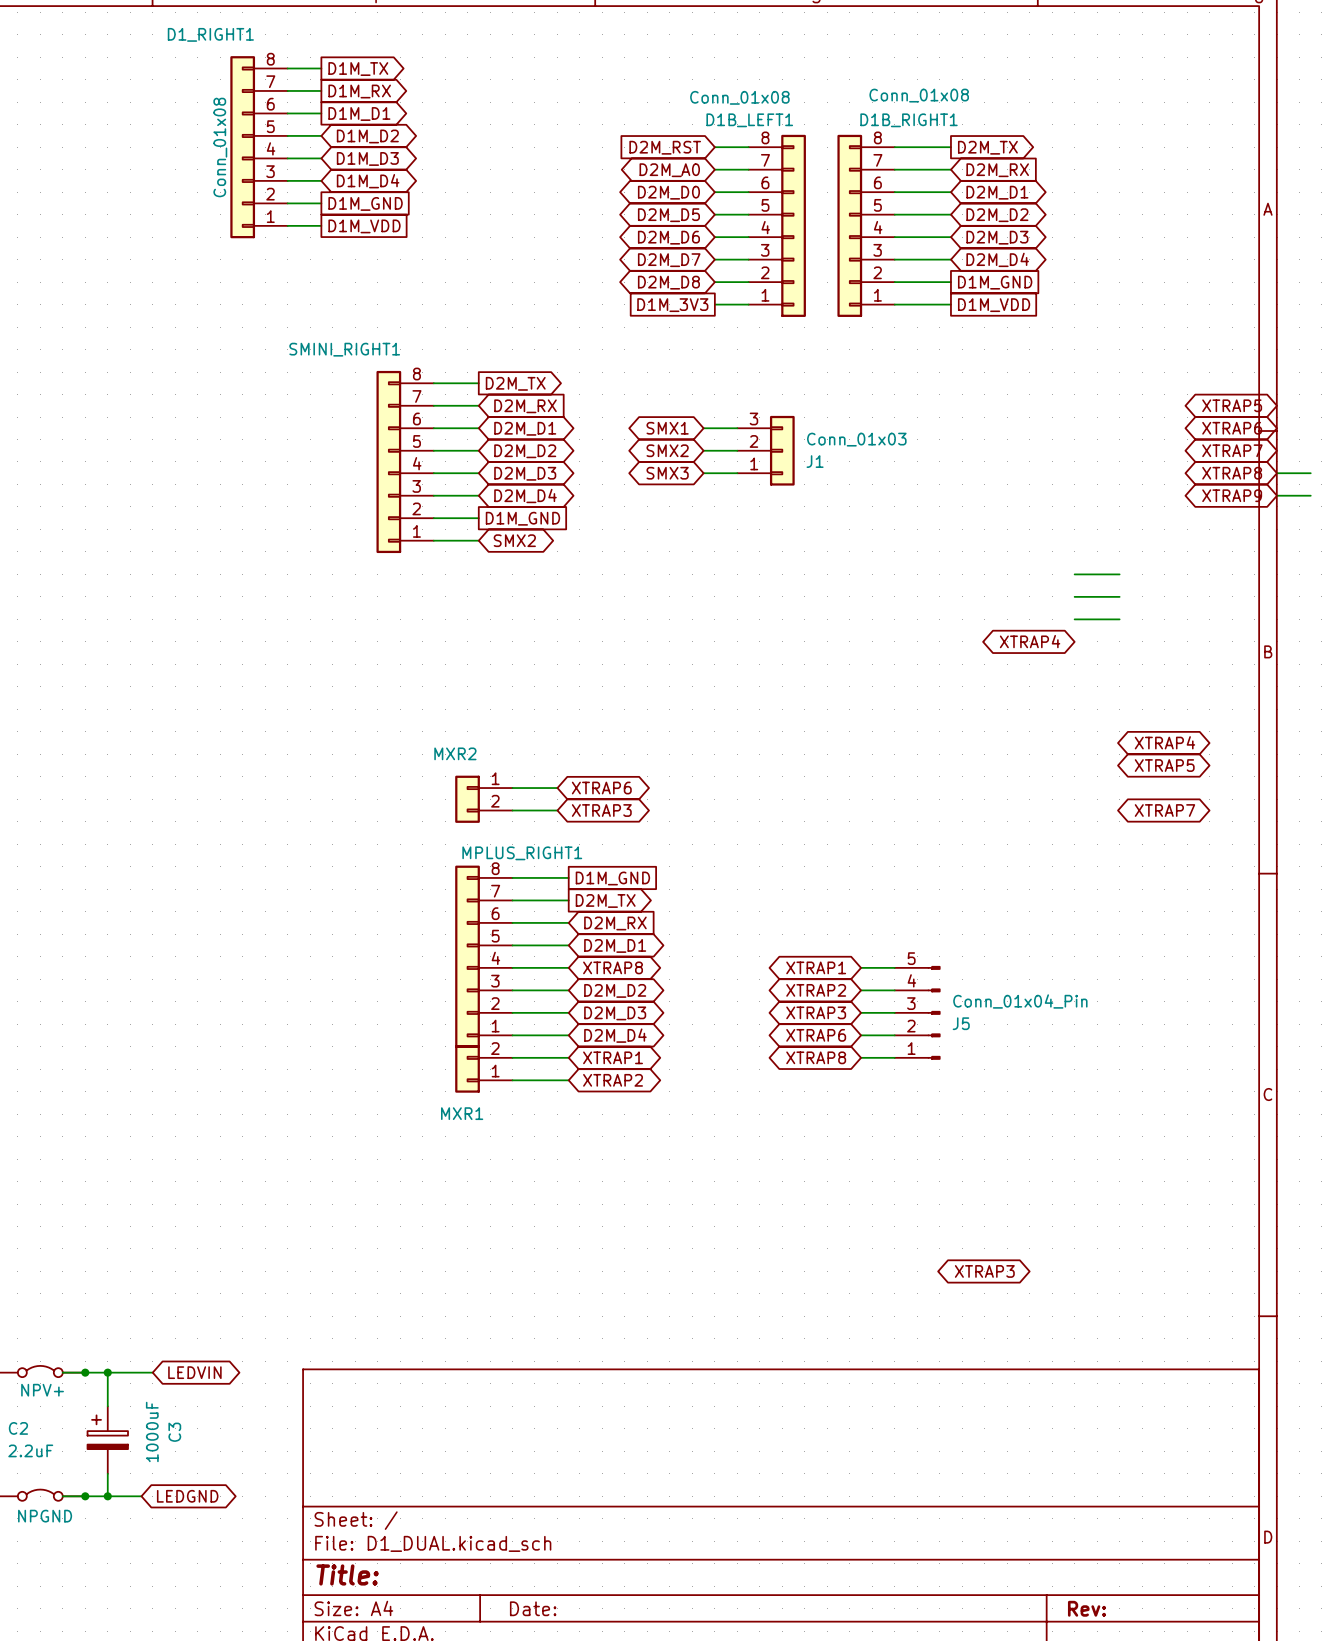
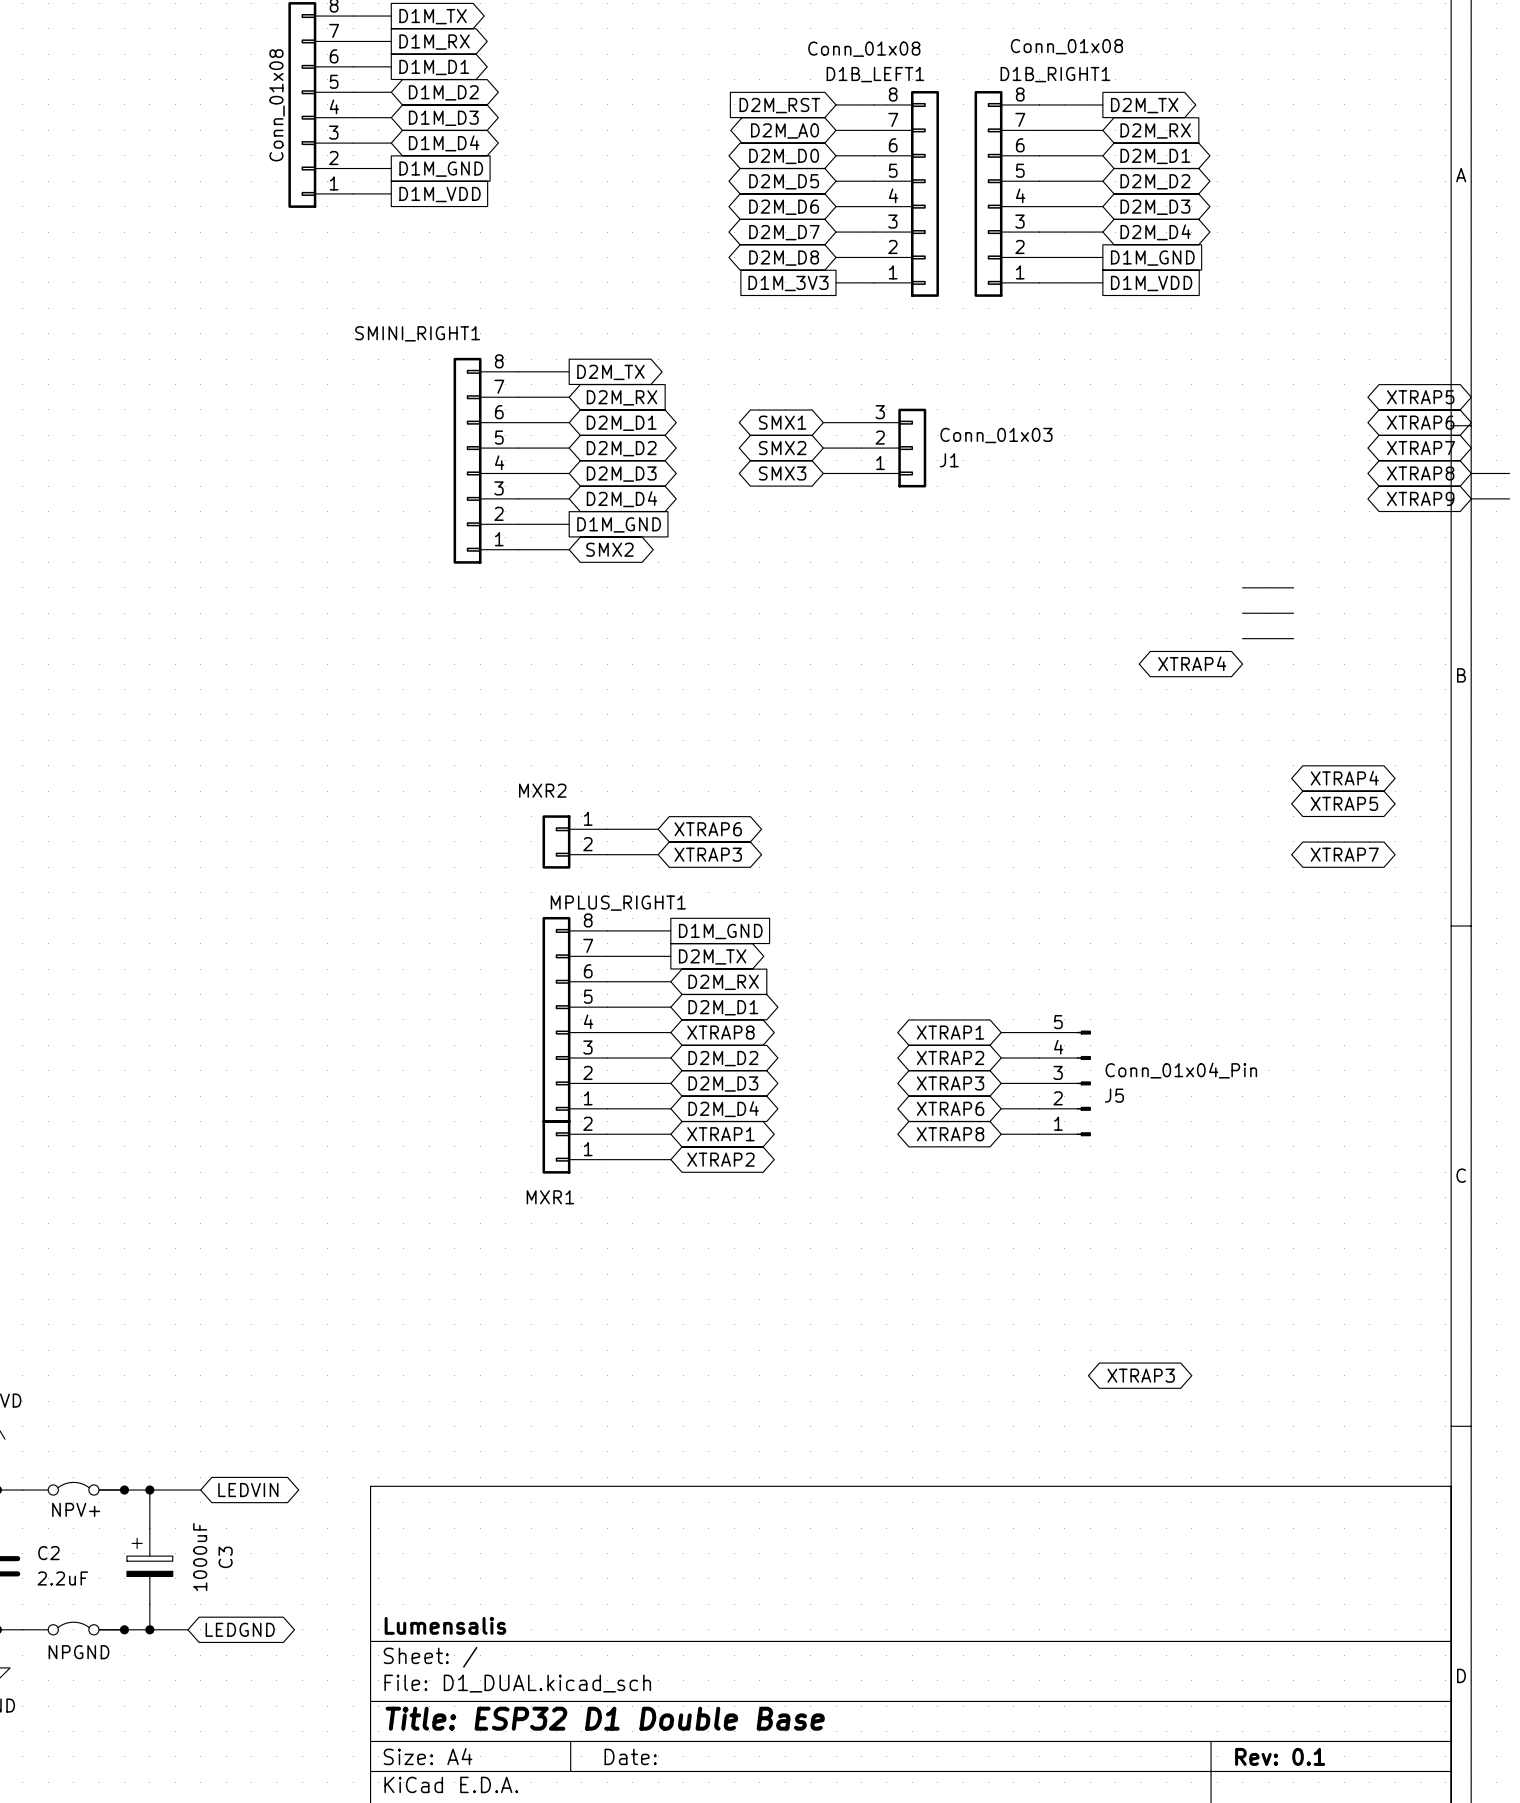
title block: none -> Lumensalis (445, 1625)
title block: Title: (347, 1574) -> Title: ESP32 D1 Double Base (605, 1718)
title block: Rev: (1086, 1608) -> Rev: 0.1 (1280, 1756)

